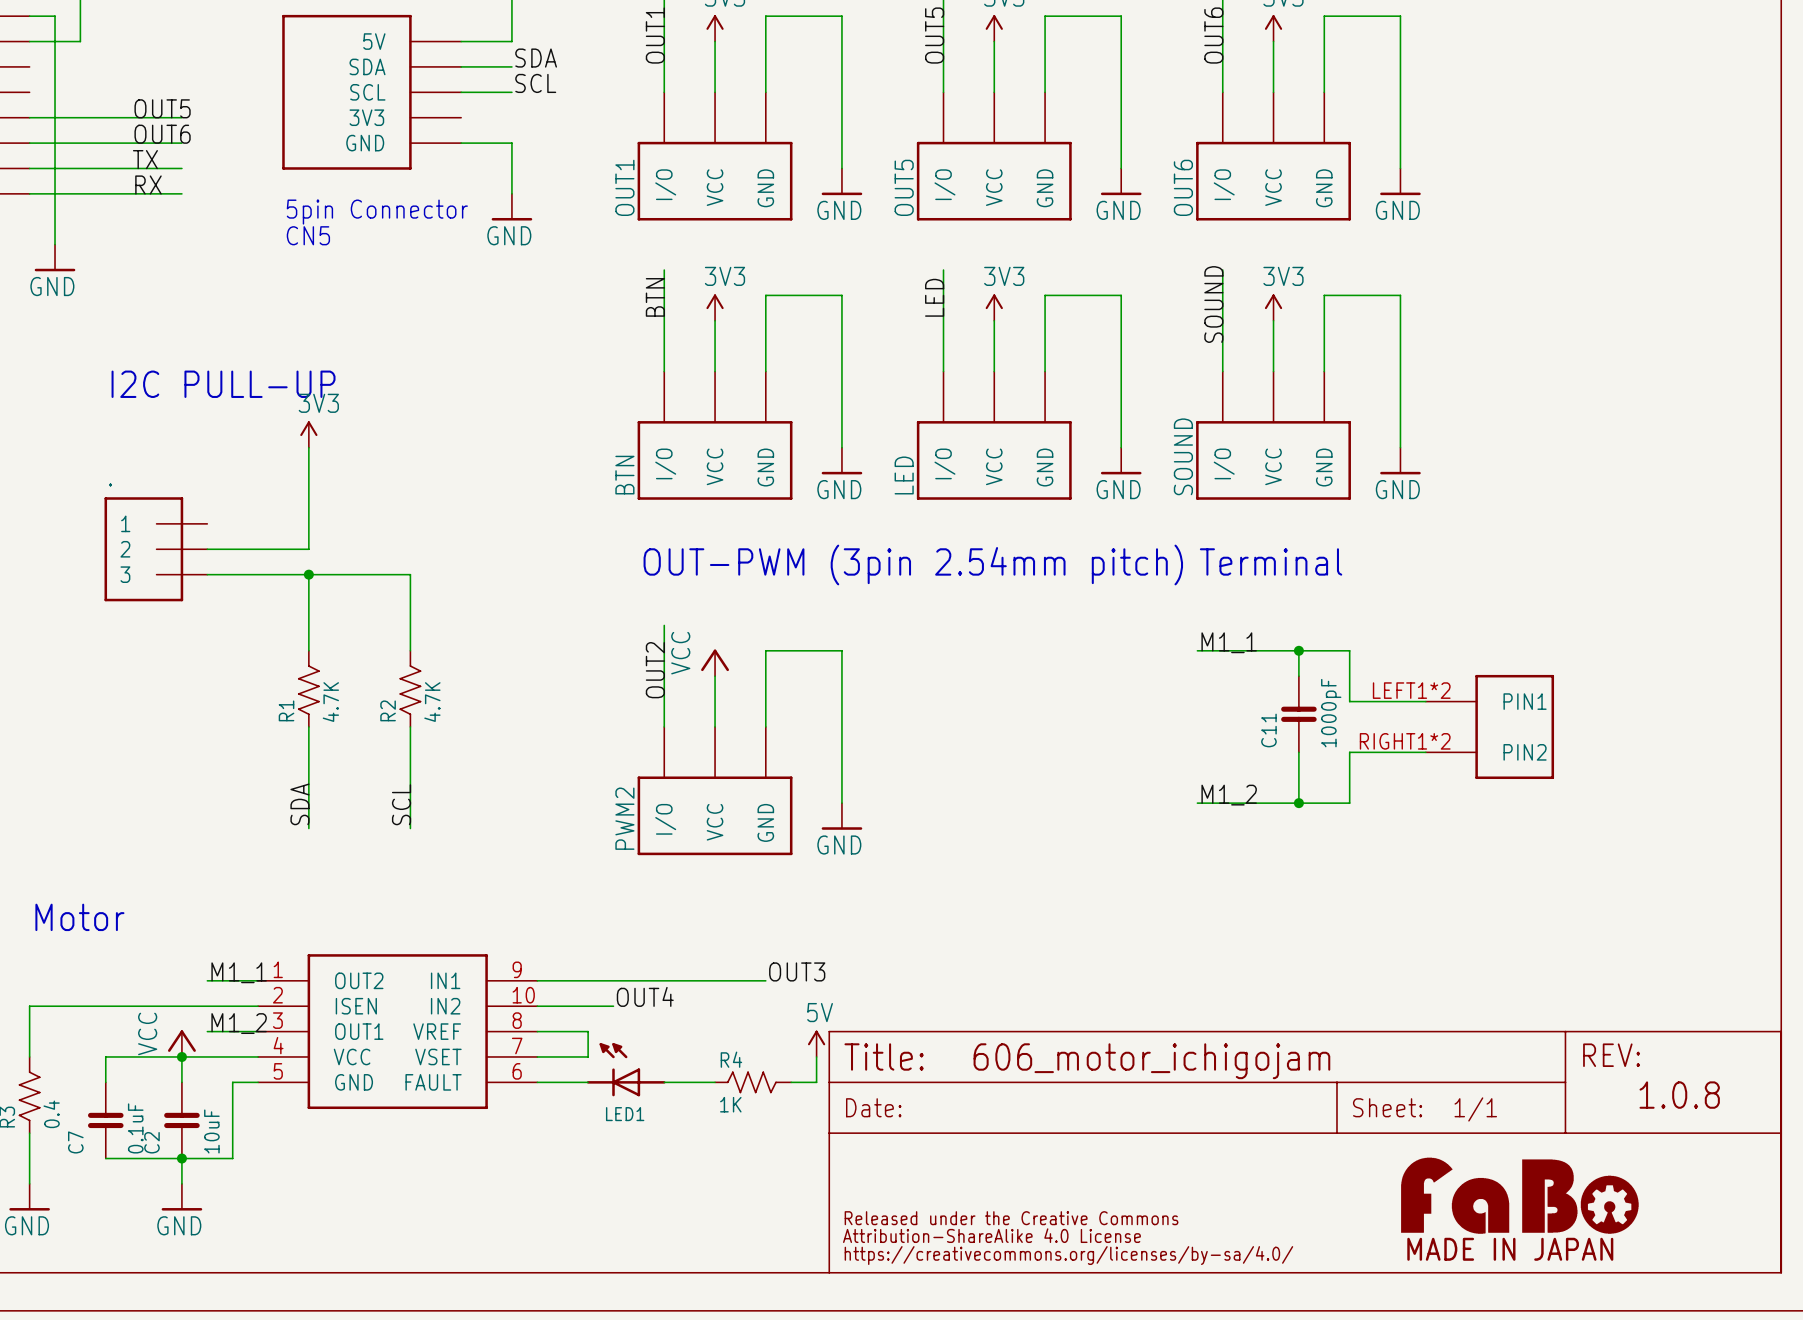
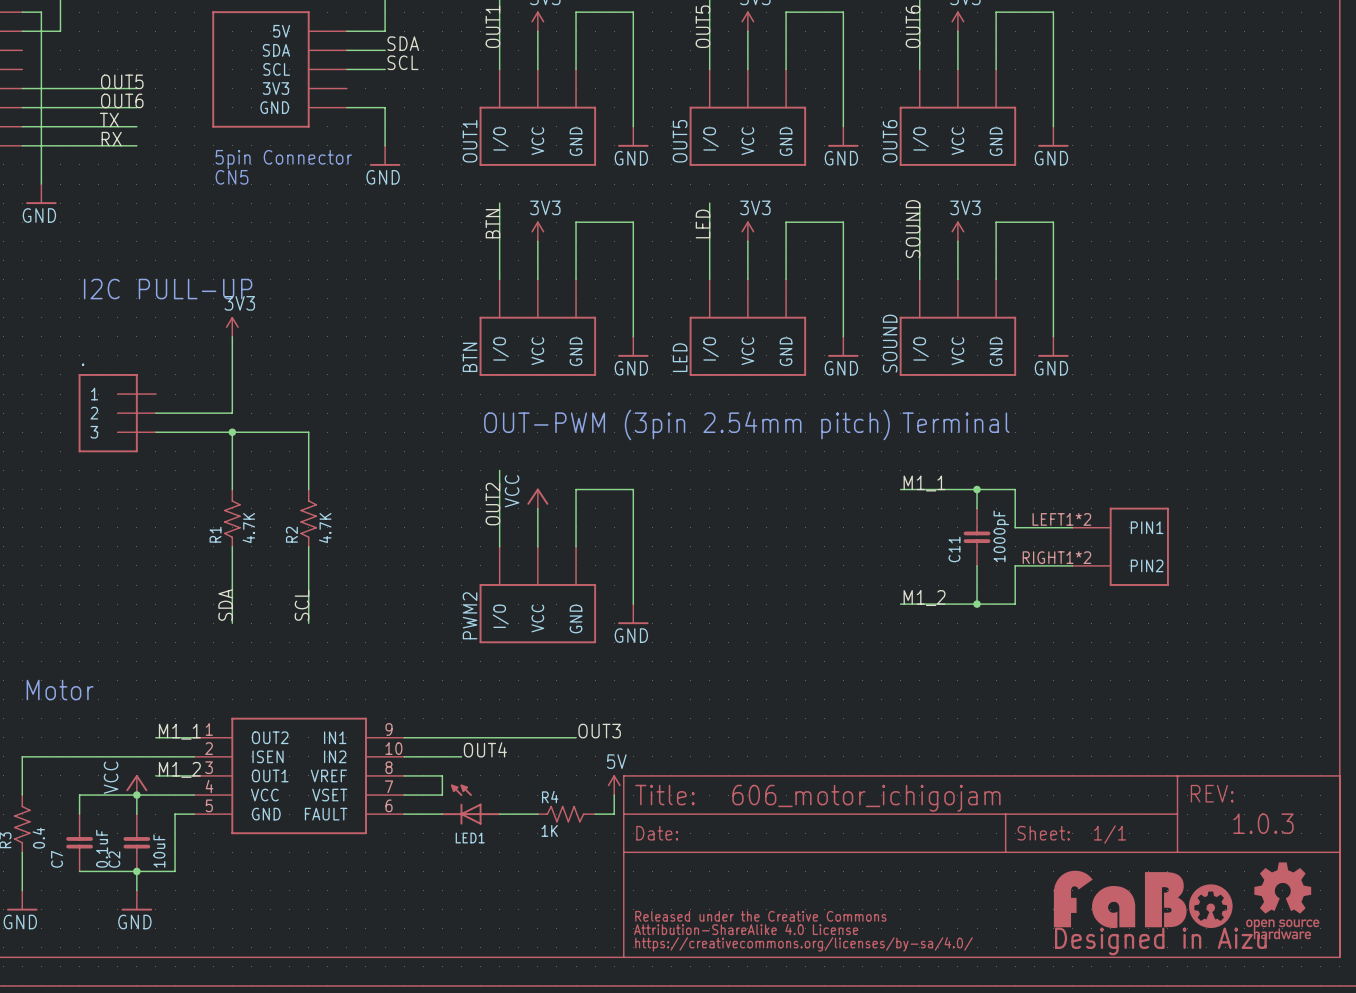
text: 1.0.8 (1679, 1095) -> 1.0.3 (1263, 823)
part: none -> (1282, 900)
part text: MADE IN JAPAN (1510, 1249) -> none
part text: none -> Designed in Aizu (1160, 941)

